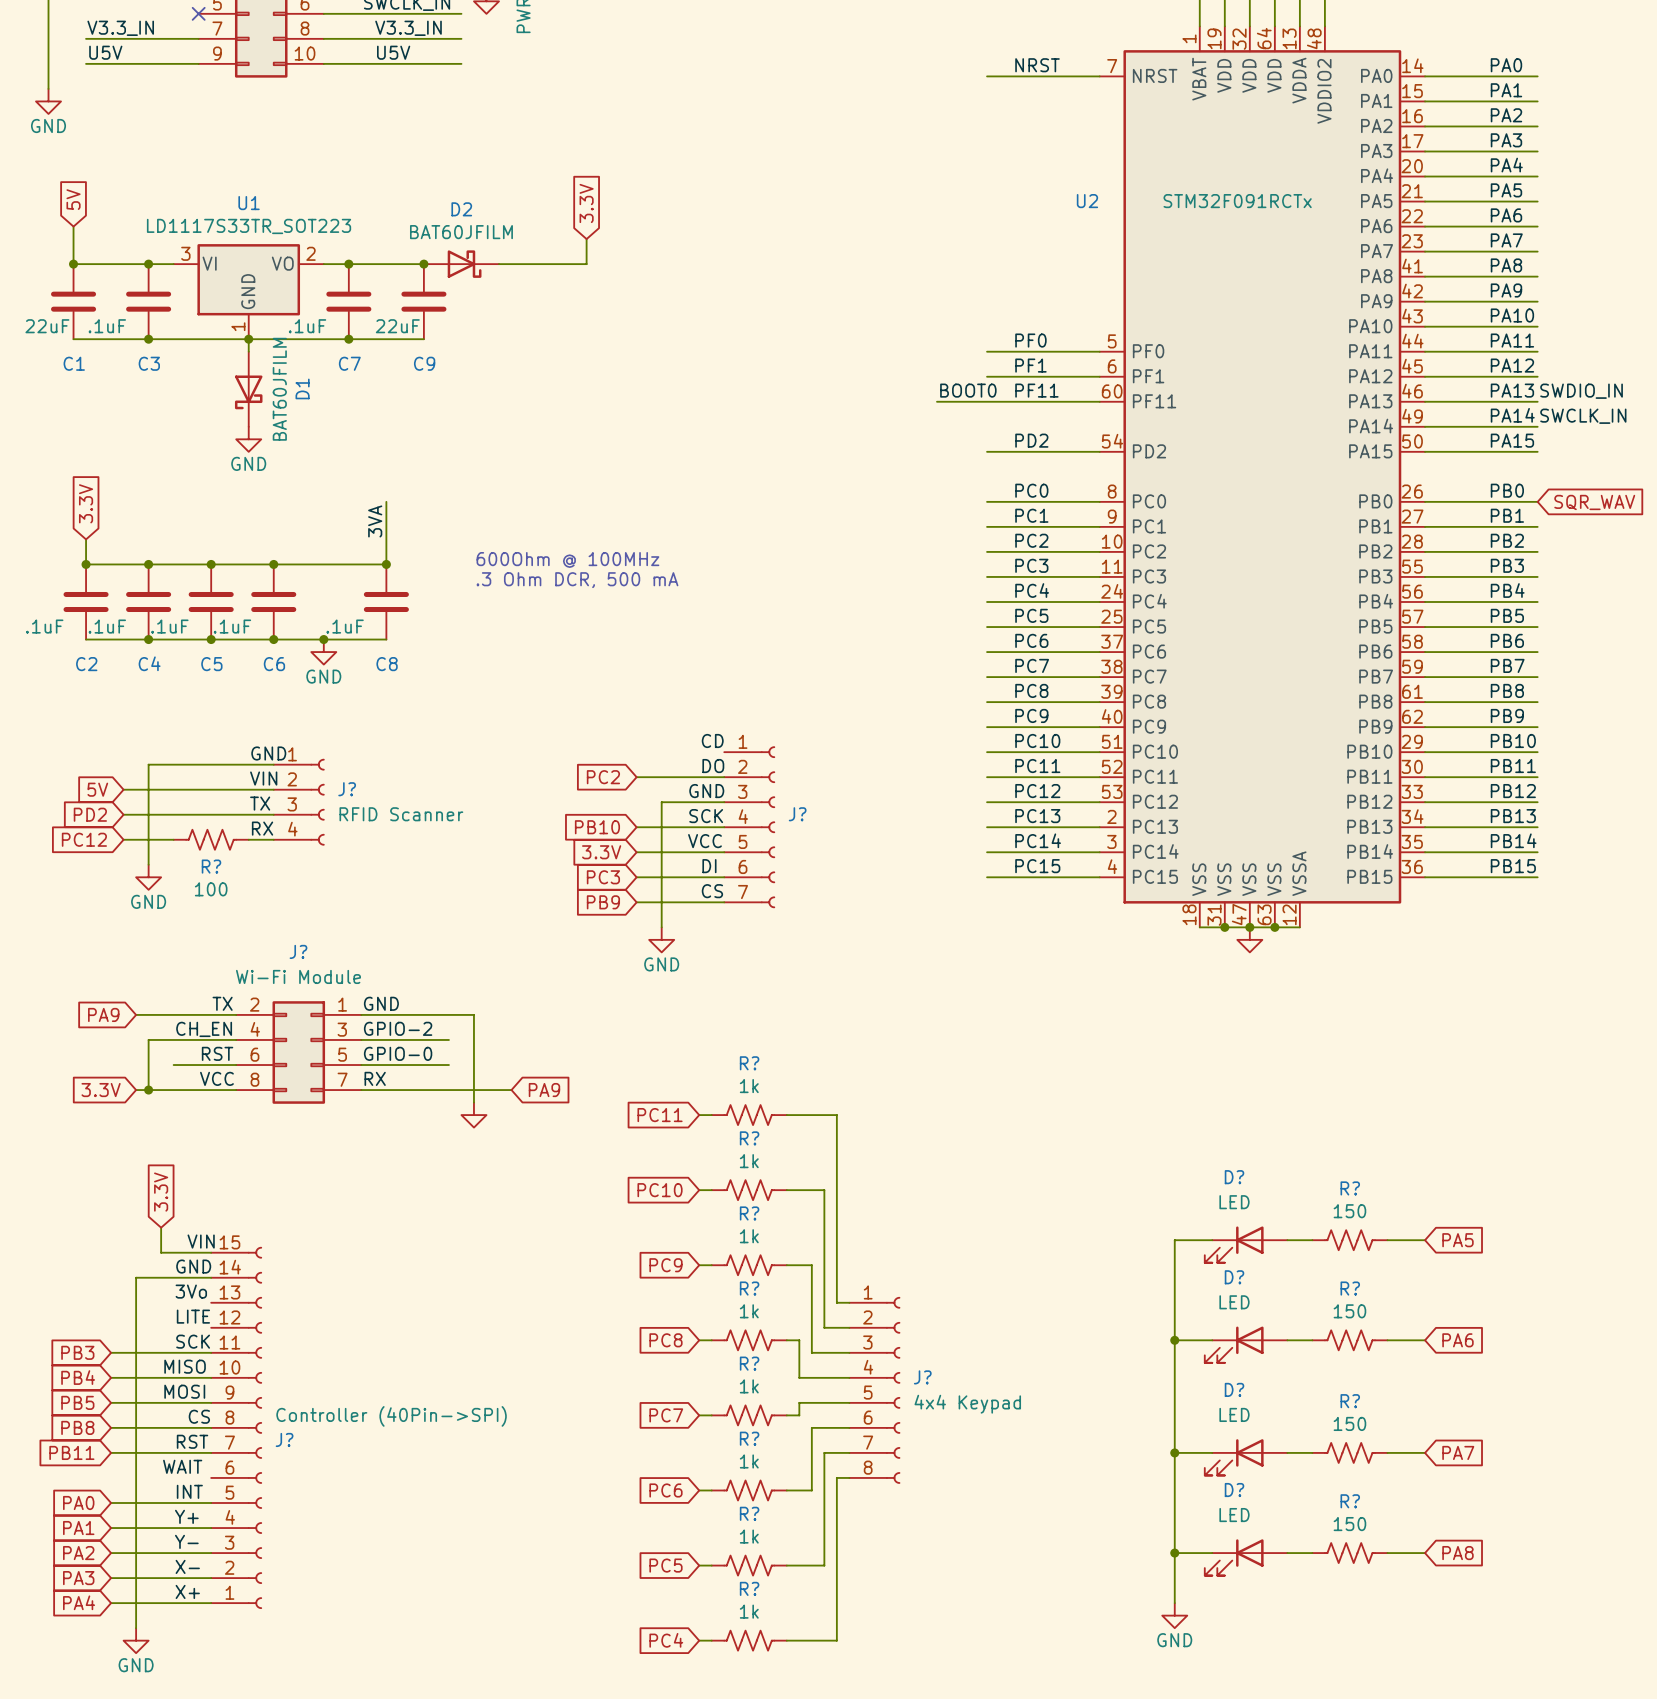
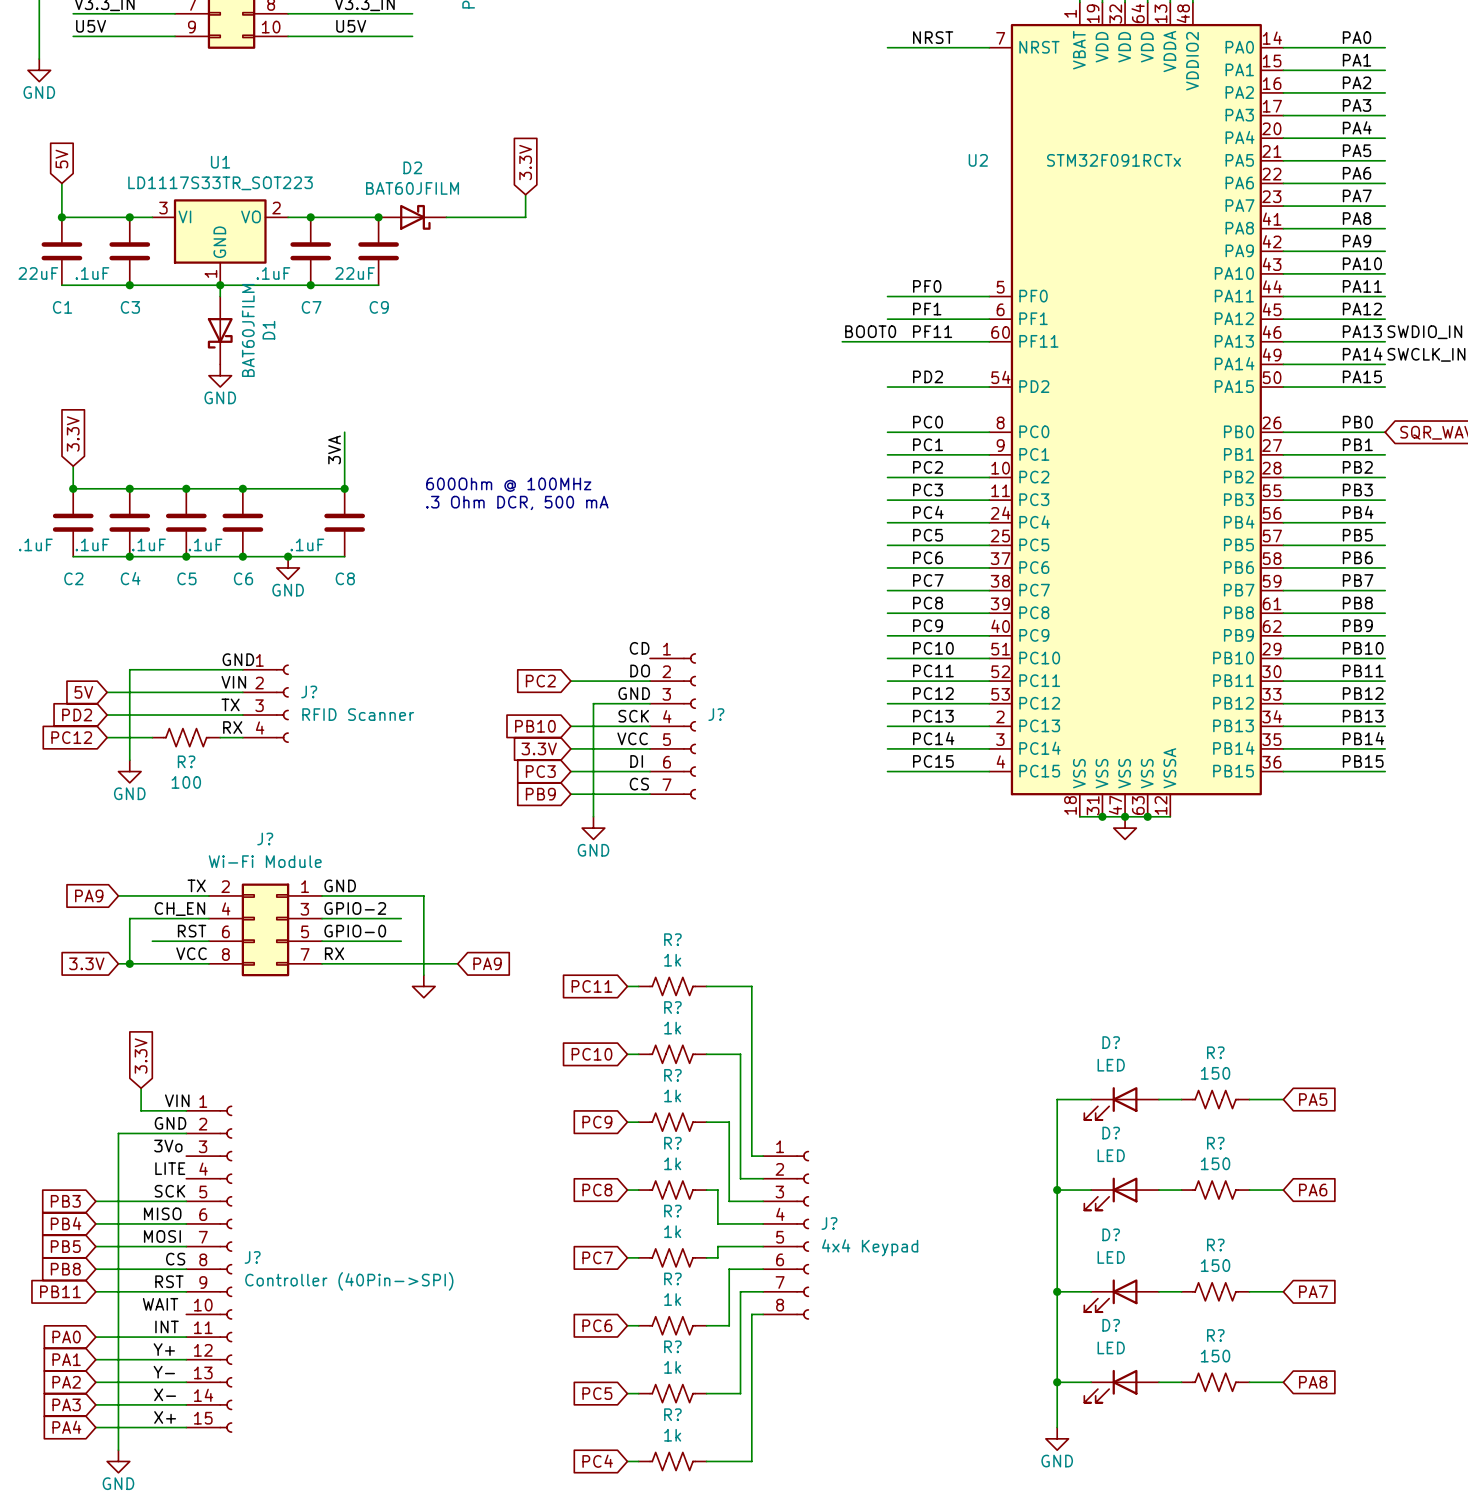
J? flip: as is (254, 1427) -> up-down (225, 1269)

